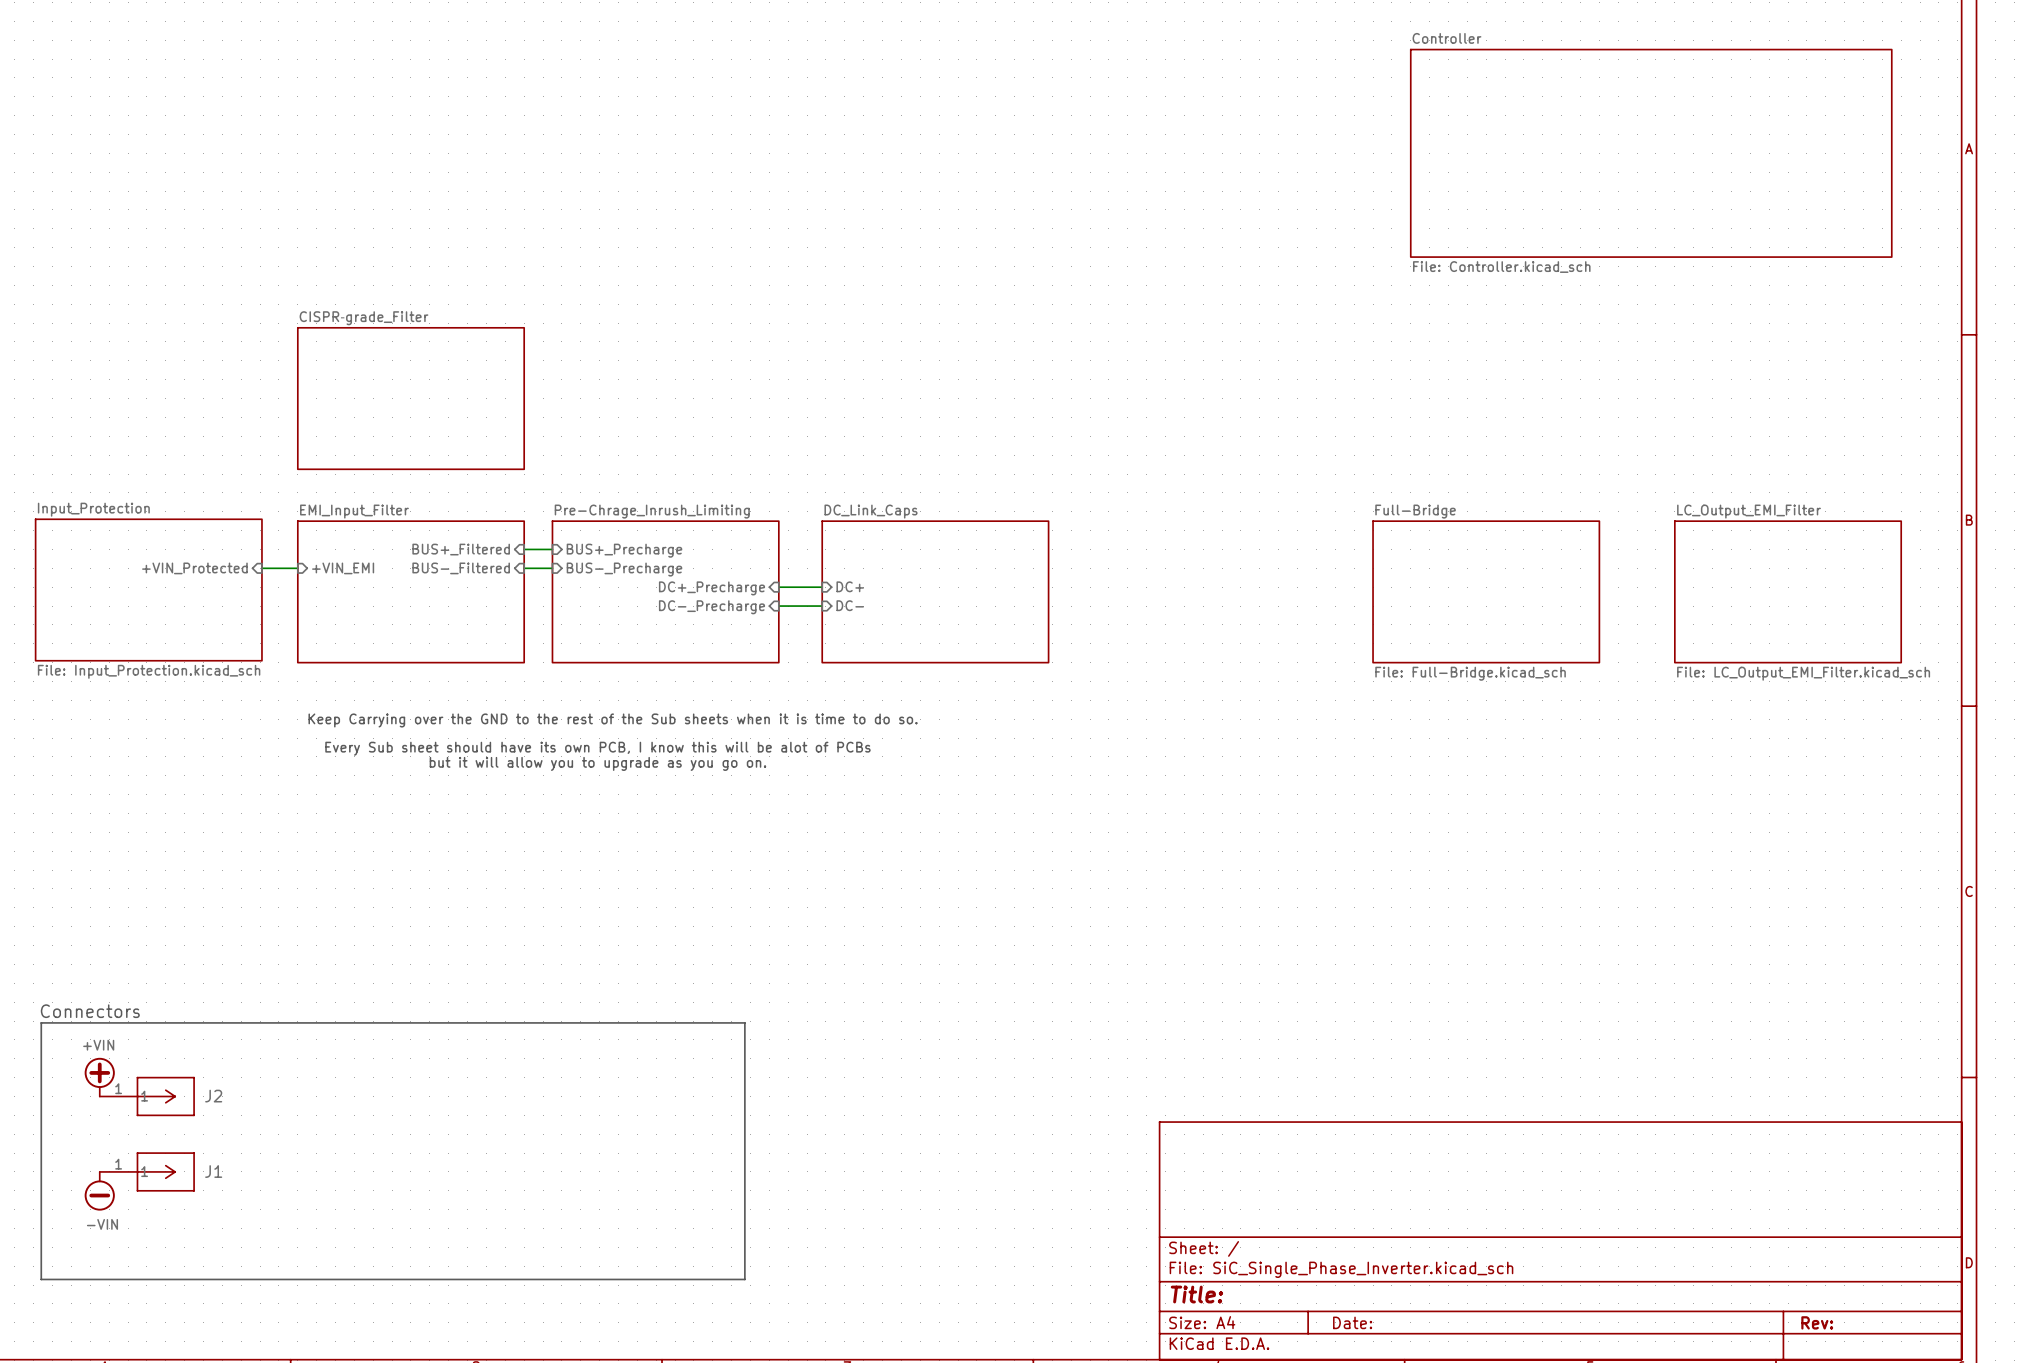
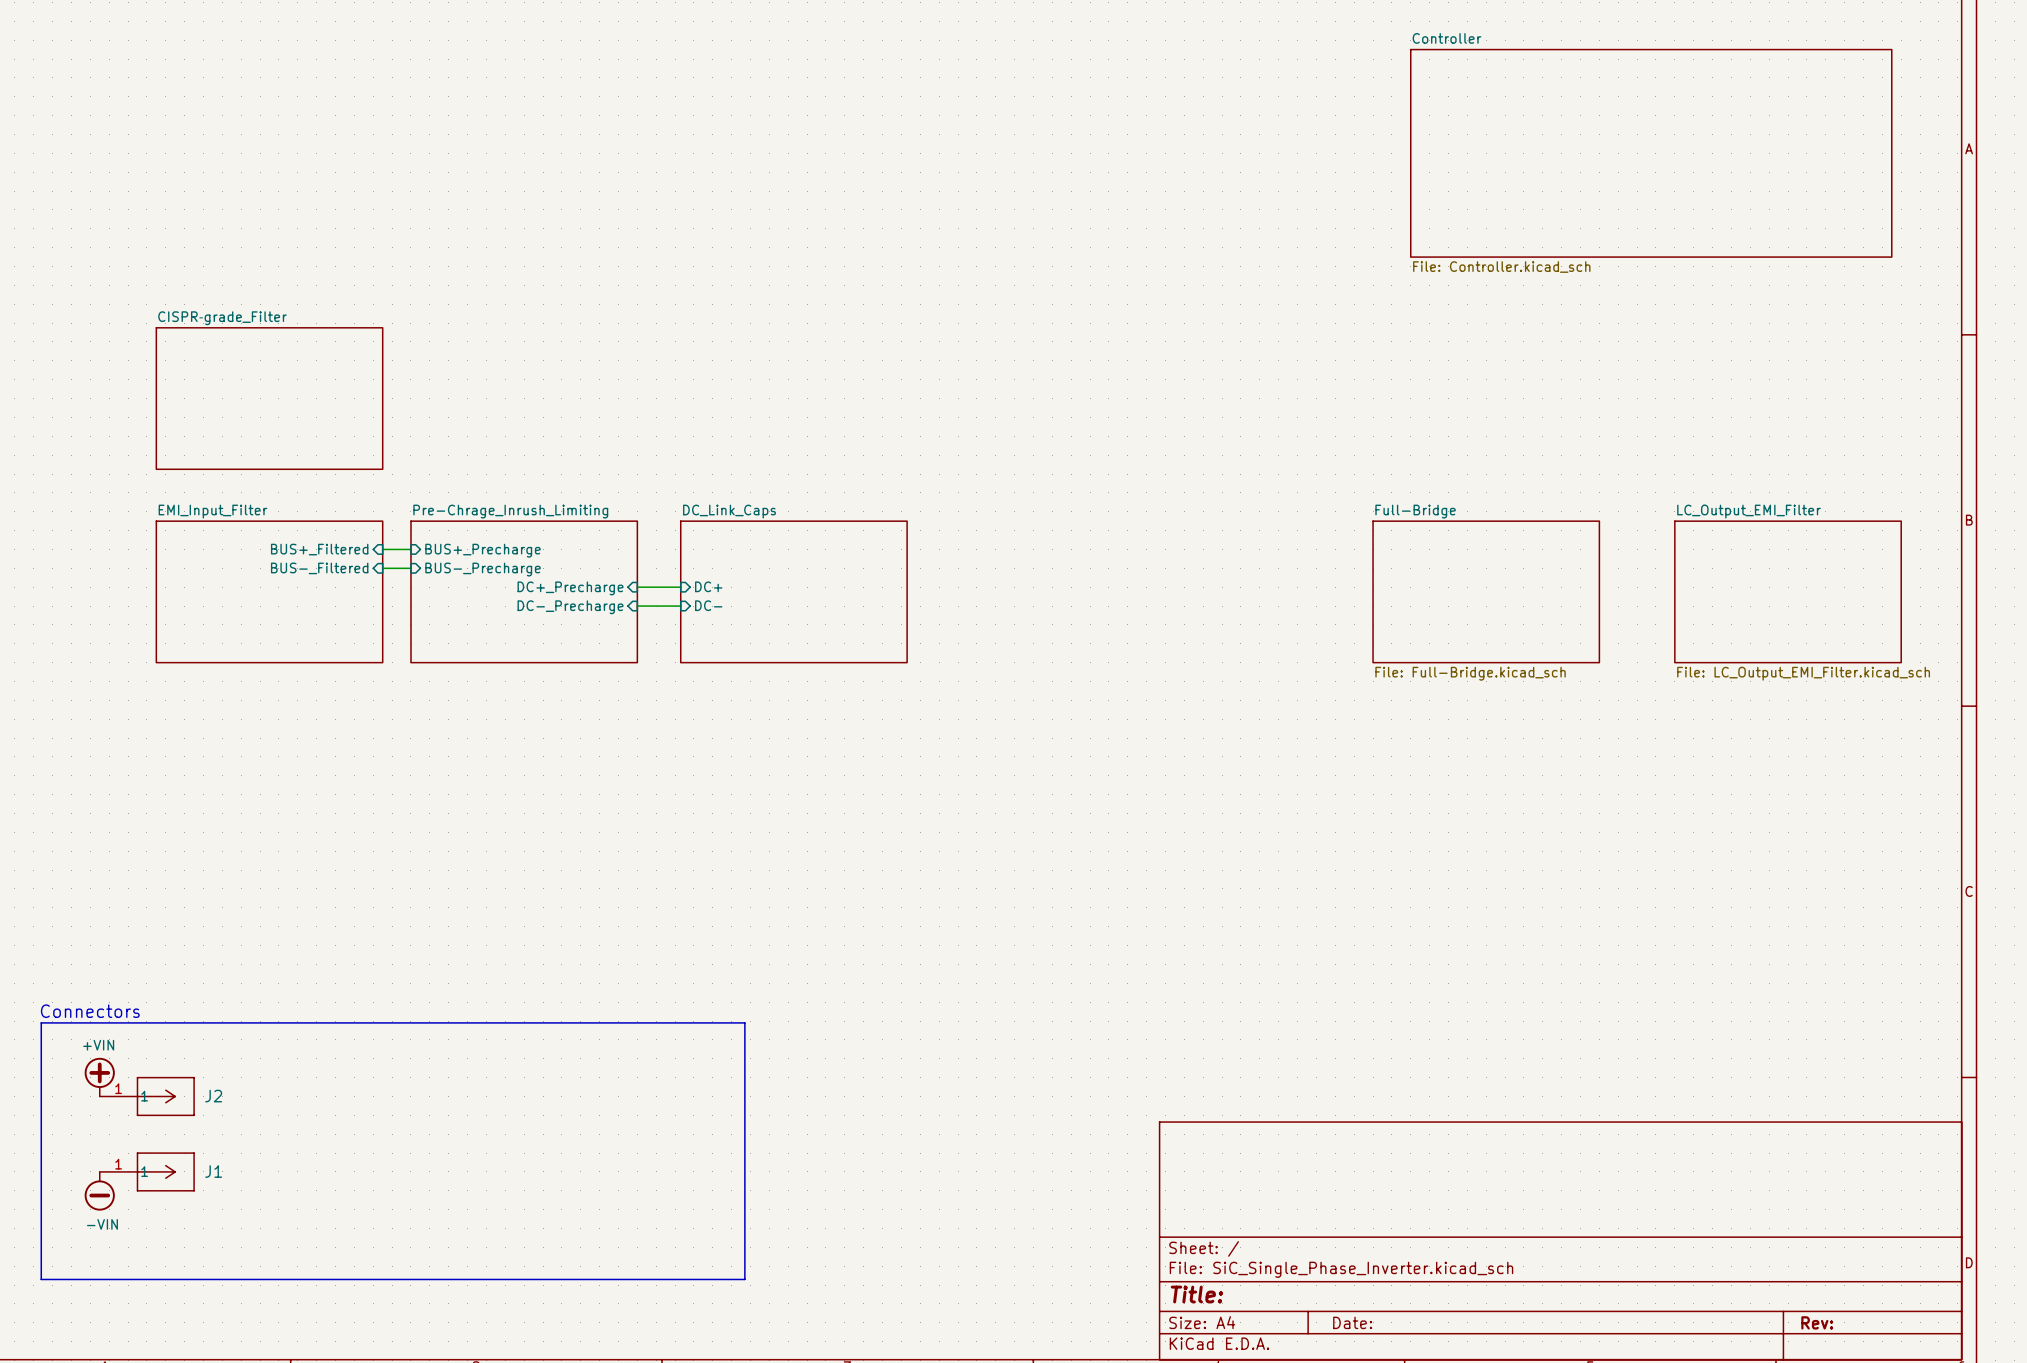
sheet CISPR‑grade_Filter position: (410, 398) -> (269, 398)
sheet pin position: BUS+_Filtered (461, 549) -> BUS+_Filtered (319, 549)
wire: (524, 549) (552, 549) -> (382, 549) (410, 549)
sheet pin position: BUS+_Precharge (624, 550) -> BUS+_Precharge (483, 550)
sheet pin: +VIN_Protected (194, 568) -> none
wire: (261, 568) (297, 568) -> none
sheet pin: +VIN_EMI (343, 568) -> none
sheet pin position: BUS-_Filtered (461, 568) -> BUS-_Filtered (319, 568)
wire: (524, 568) (552, 568) -> (382, 568) (410, 568)
sheet pin position: BUS-_Precharge (624, 569) -> BUS-_Precharge (483, 569)
sheet pin position: DC+ (850, 586) -> DC+ (708, 586)
wire: (778, 587) (822, 587) -> (637, 587) (680, 587)
sheet pin position: DC+_Precharge (711, 588) -> DC+_Precharge (570, 588)
sheet Input_Protection: File: Input_Protection.kicad_sch (148, 590) -> none
sheet EMI_Input_Filter position: (410, 591) -> (269, 591)
sheet Pre-Chrage_Inrush_Limiting position: (665, 591) -> (524, 591)
sheet DC_Link_Caps position: (935, 591) -> (793, 591)
sheet pin position: DC- (850, 605) -> DC- (708, 605)
wire: (778, 606) (822, 606) -> (637, 606) (680, 606)
sheet pin position: DC-_Precharge (711, 607) -> DC-_Precharge (570, 607)
text: Keep Carrying over the GND to the rest of the Sub sheets when it is time to do so. (613, 720) -> none
text: Every Sub sheet should have its own PCB, I know this will be alot of PCBs (597, 748) -> none
text: but it will allow you to upgrade as you go on. (597, 763) -> none

